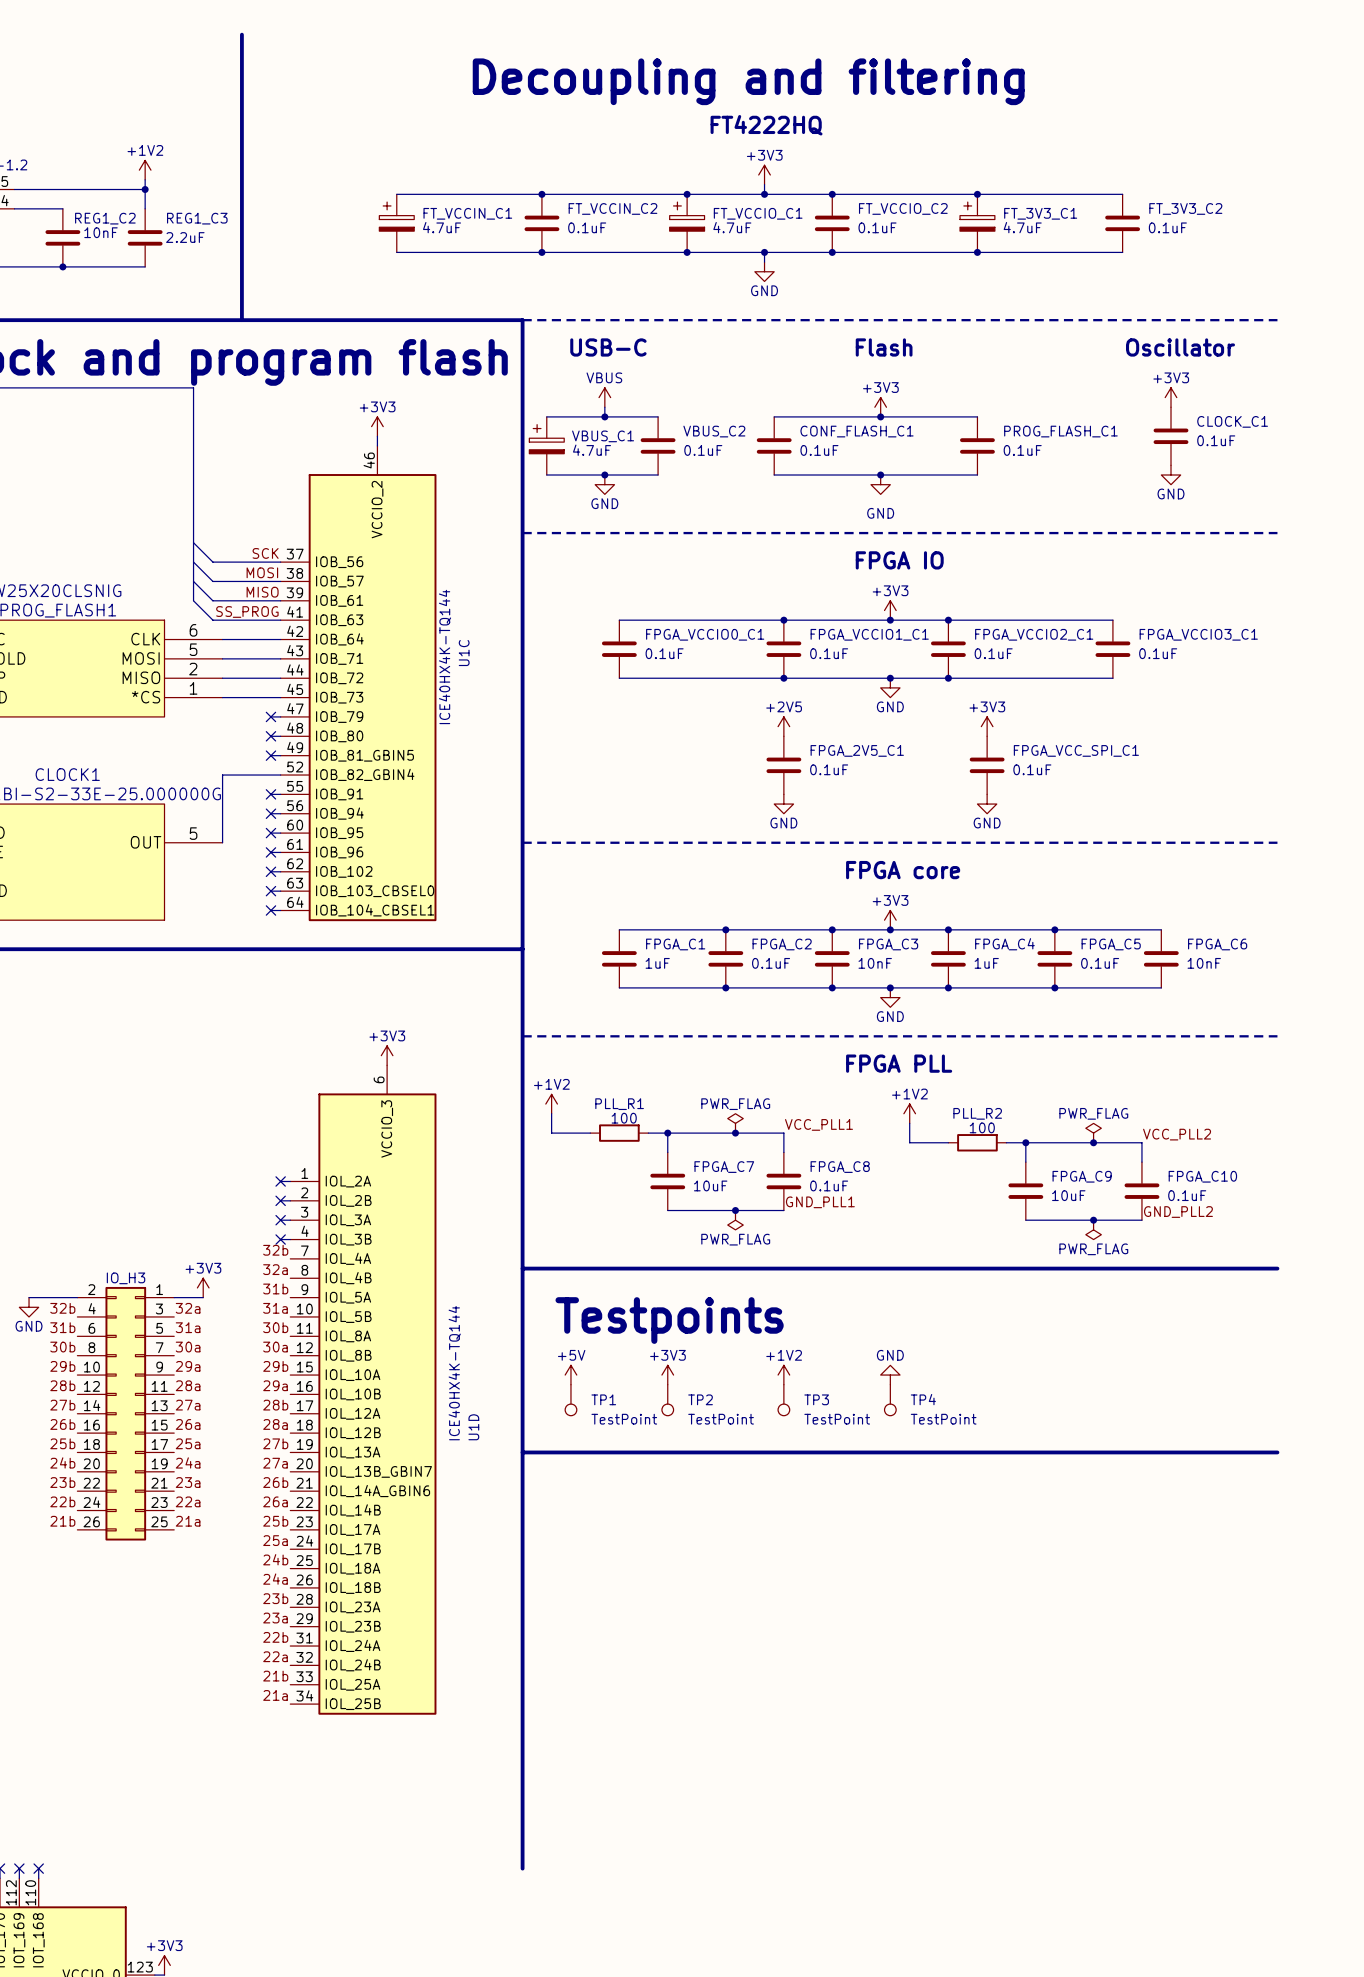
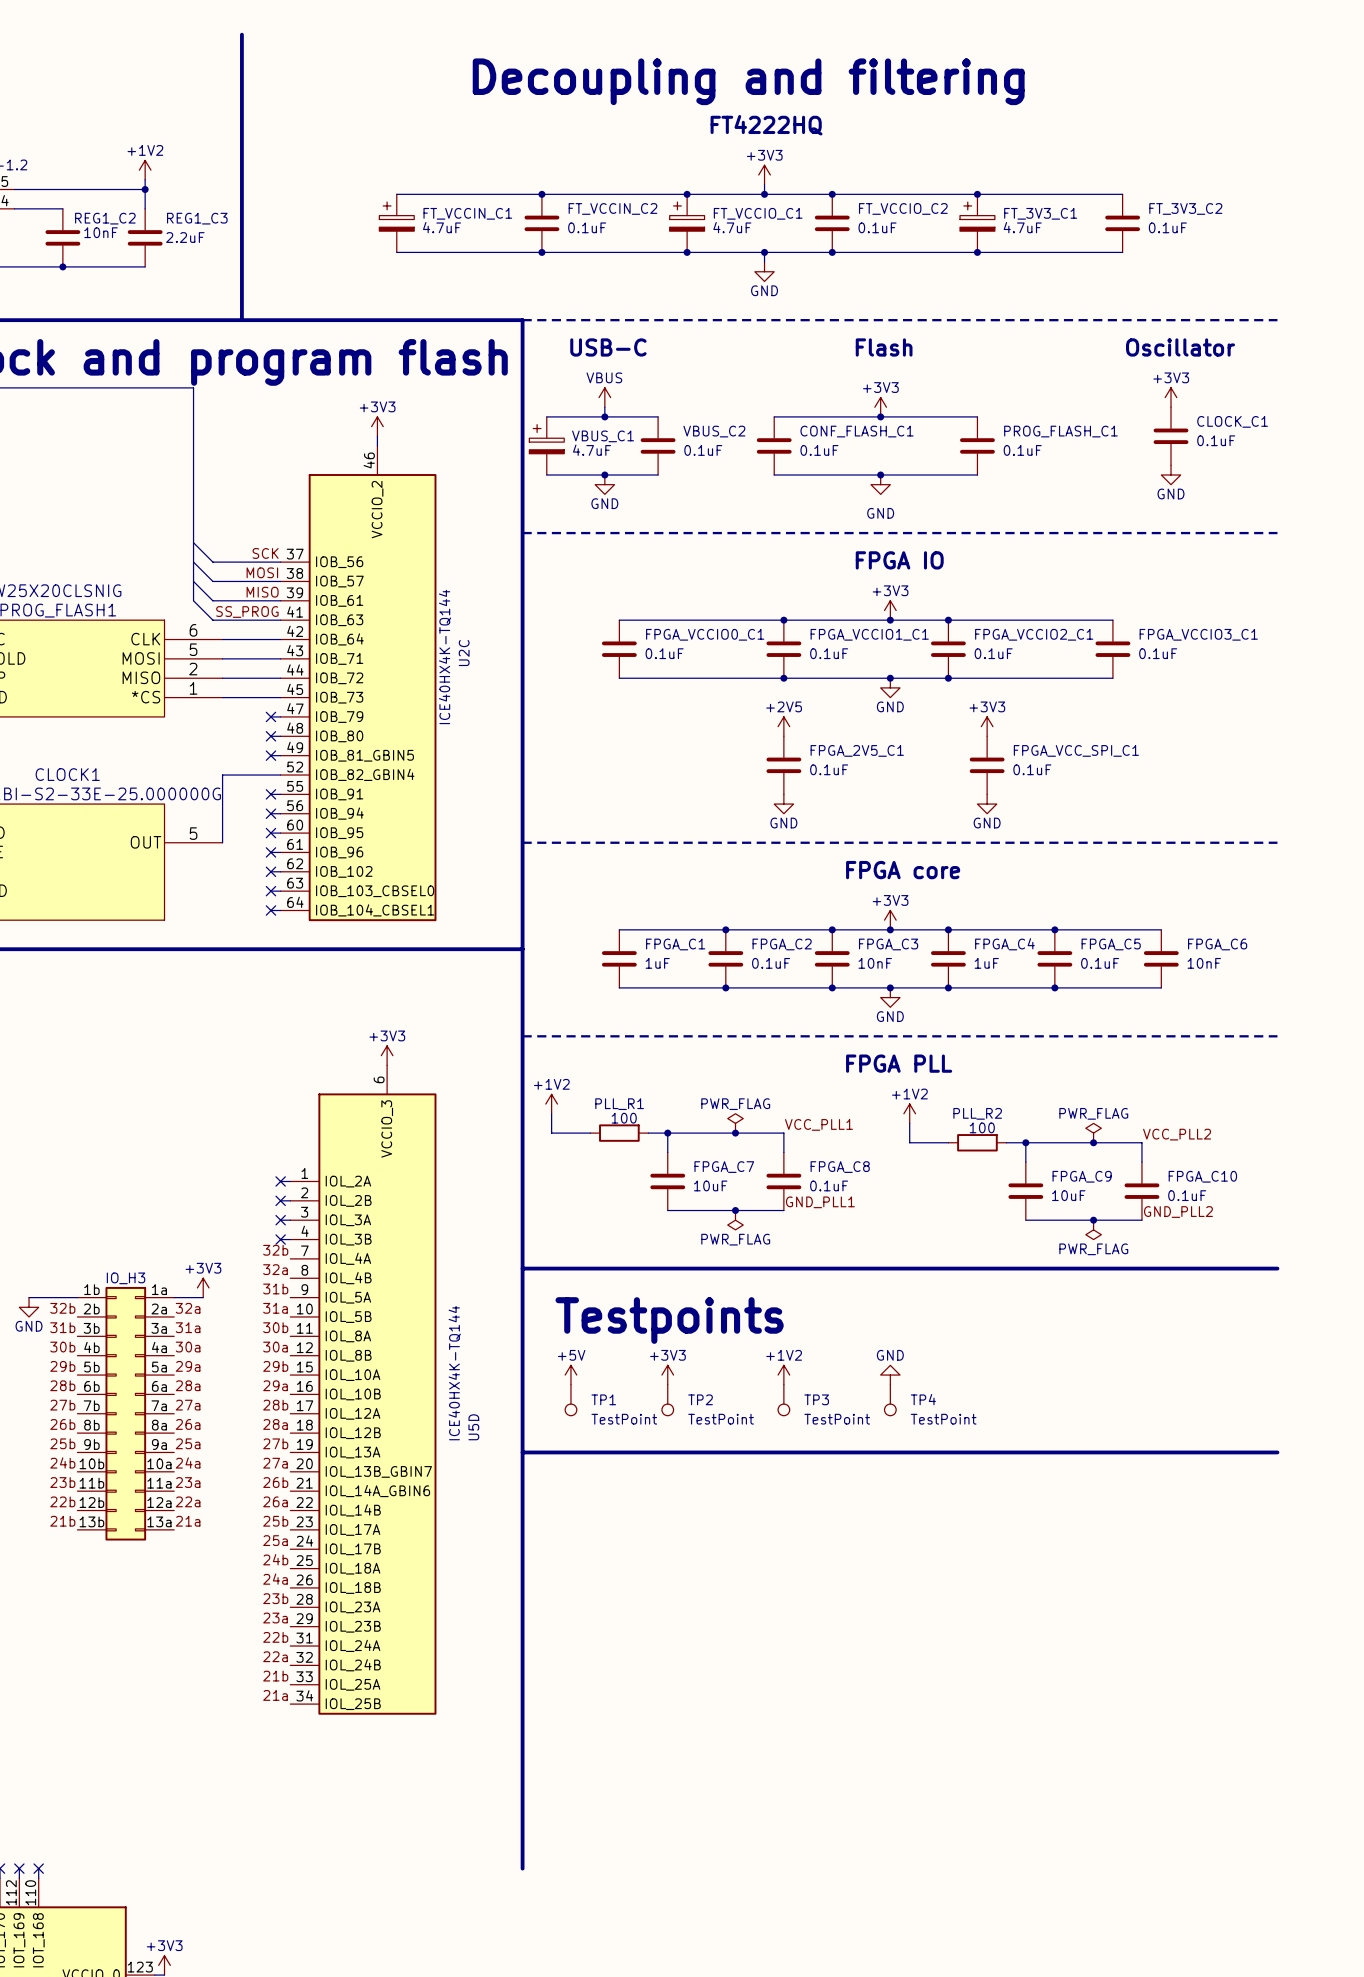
U1C name: U1C (464, 653) -> U2C (464, 653)
IO_H3 symbol: [77, 1286, 175, 1541] -> [77, 1286, 175, 1541]
U1D name: U1D (473, 1427) -> U5D (473, 1427)

